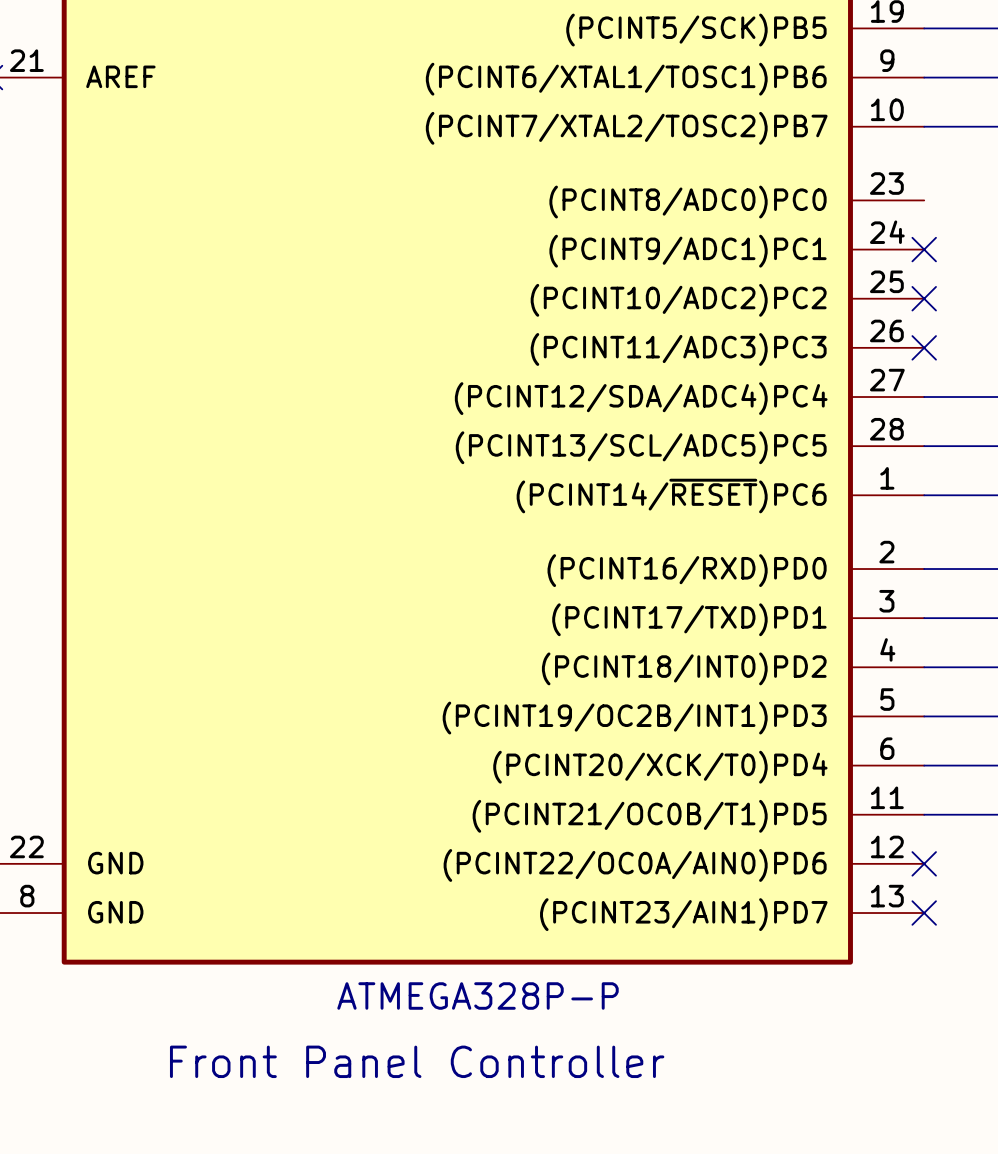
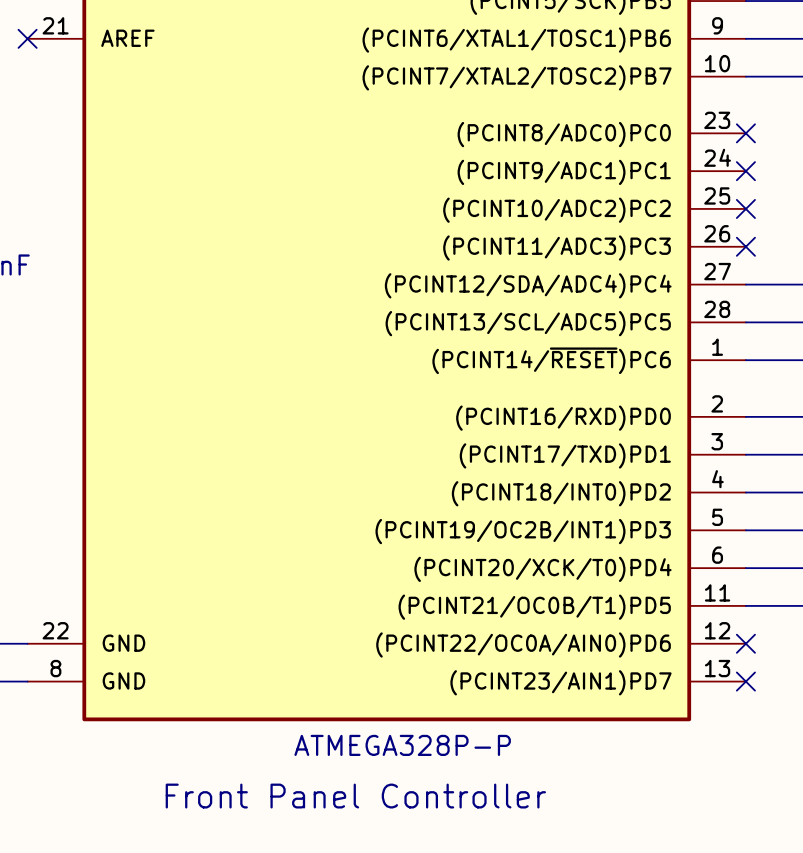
no-connect mark: none -> (745, 133)

